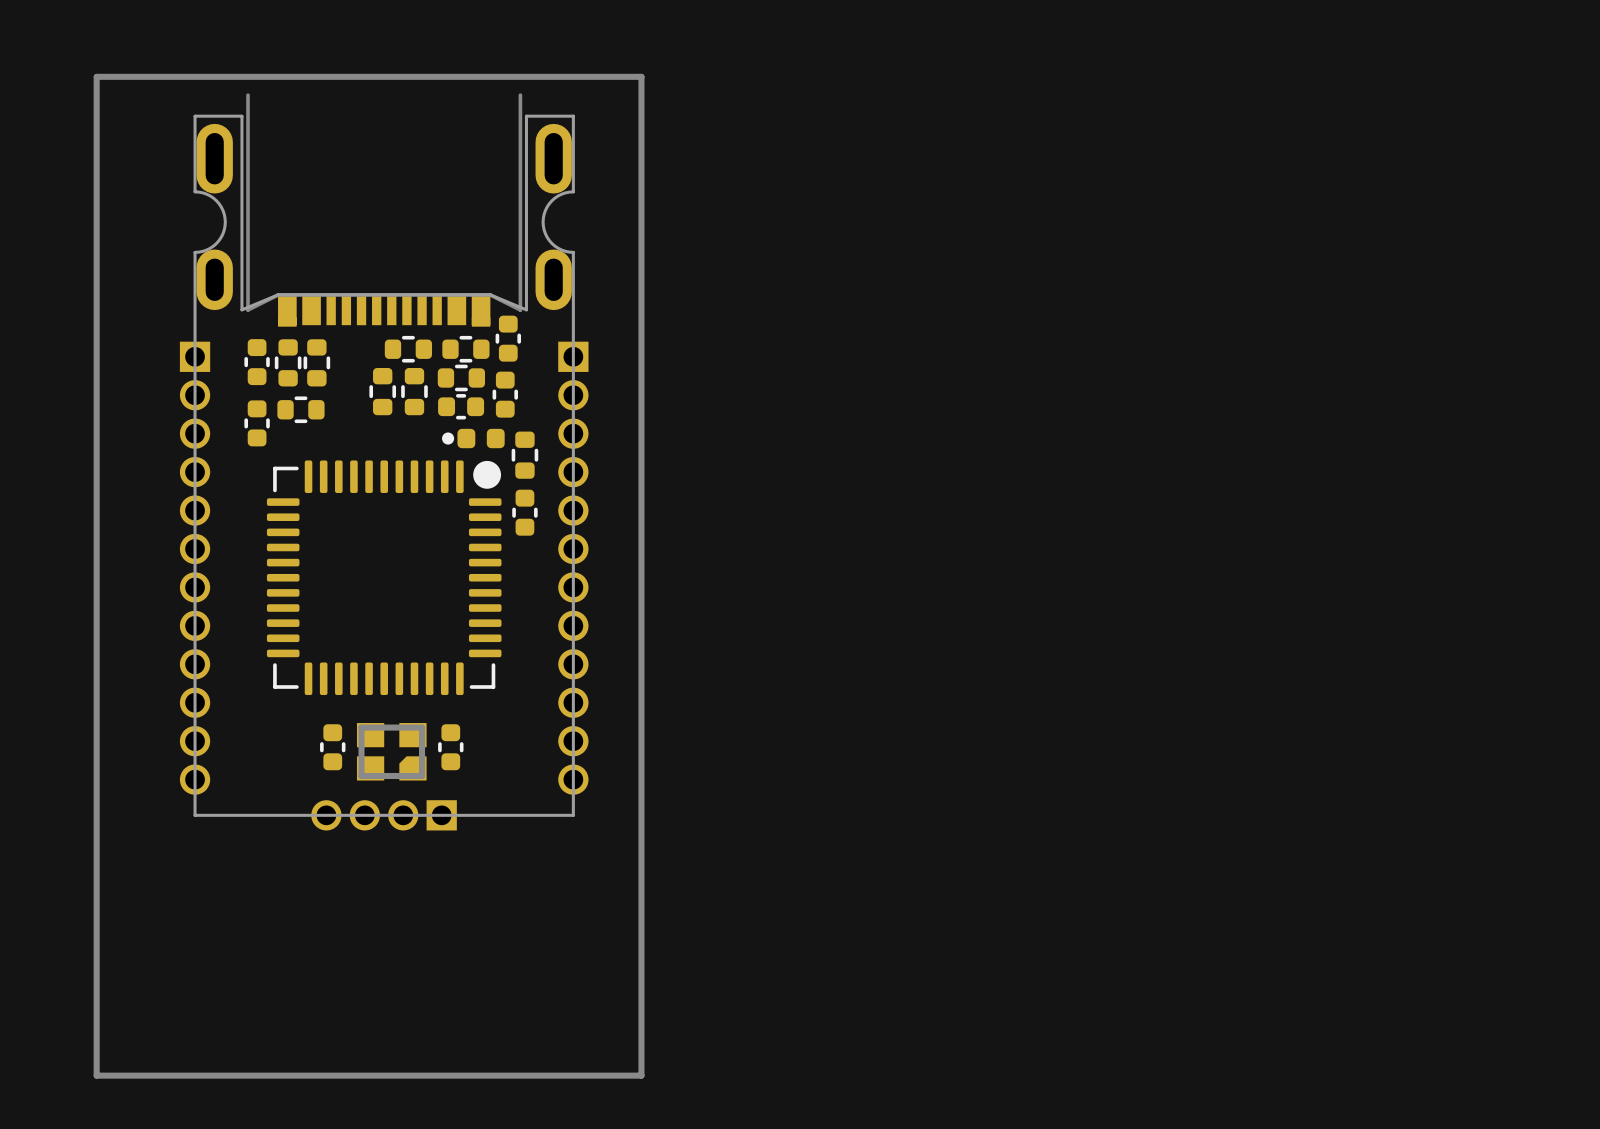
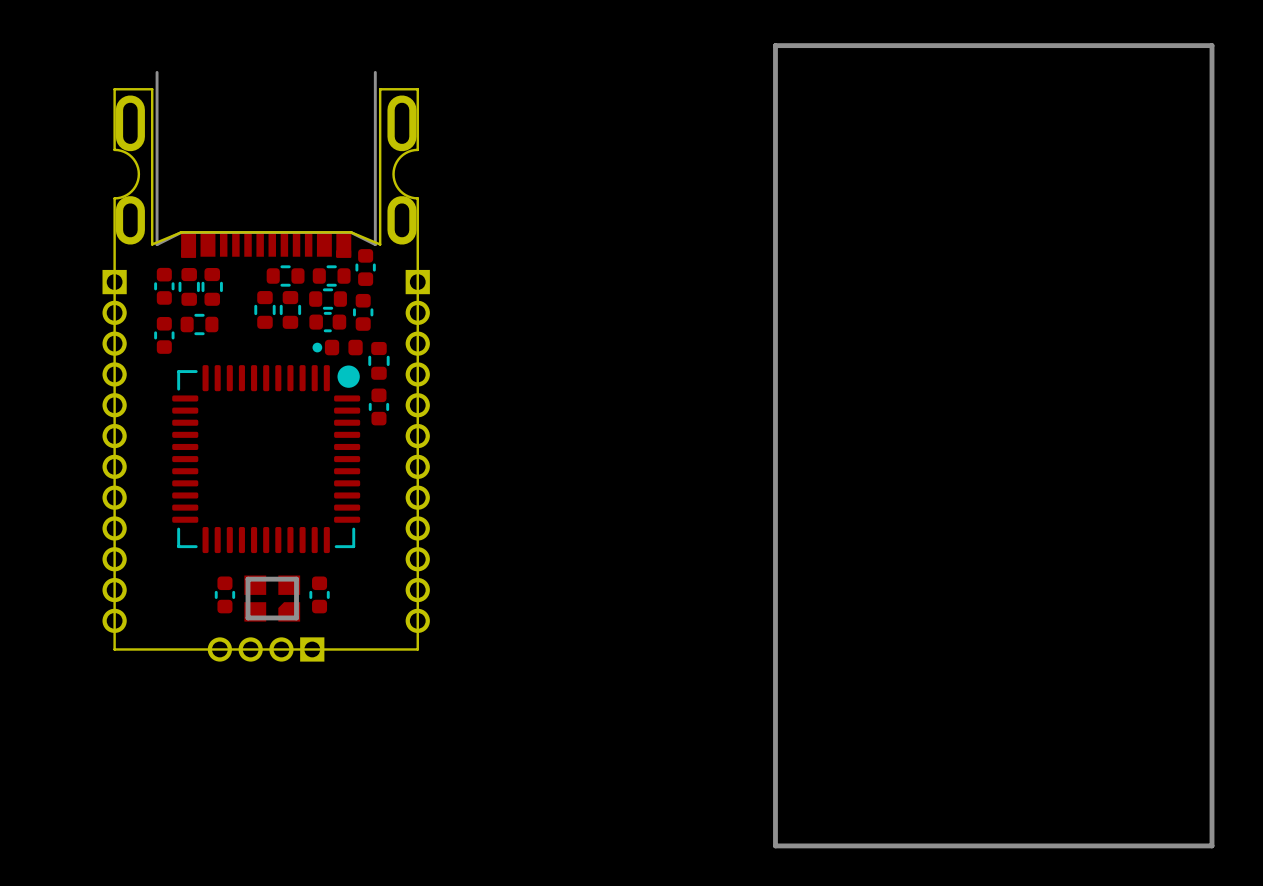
line: none -> (775, 45) (1212, 45) (1212, 845) (775, 845) (775, 45)
line: (96, 76) (641, 76) (641, 1075) (96, 1075) (96, 76) -> none

